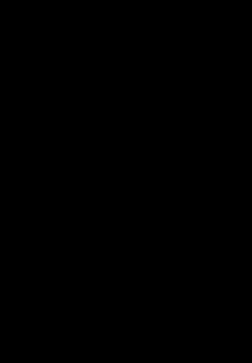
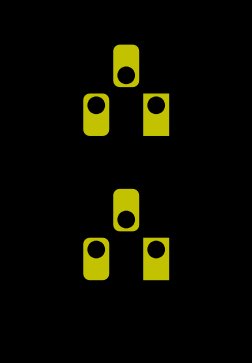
part: none -> (126, 90)
part: none -> (126, 234)

